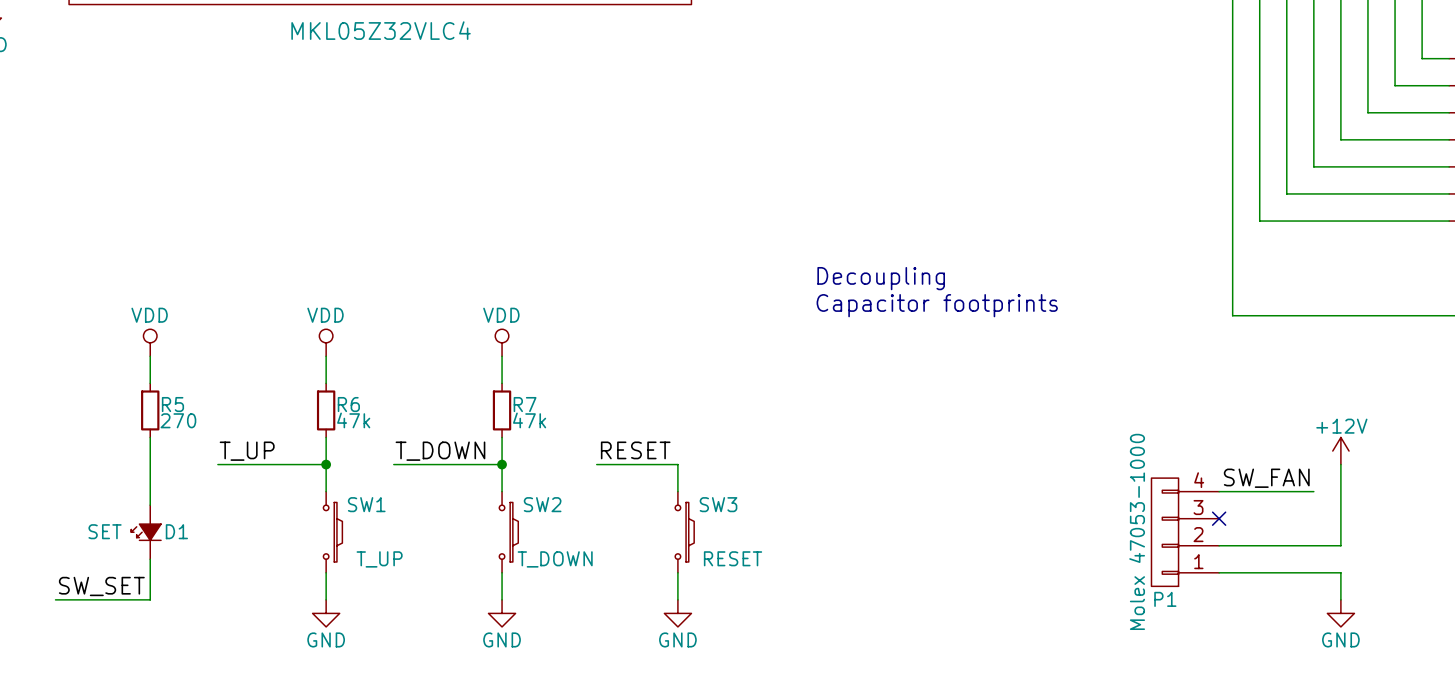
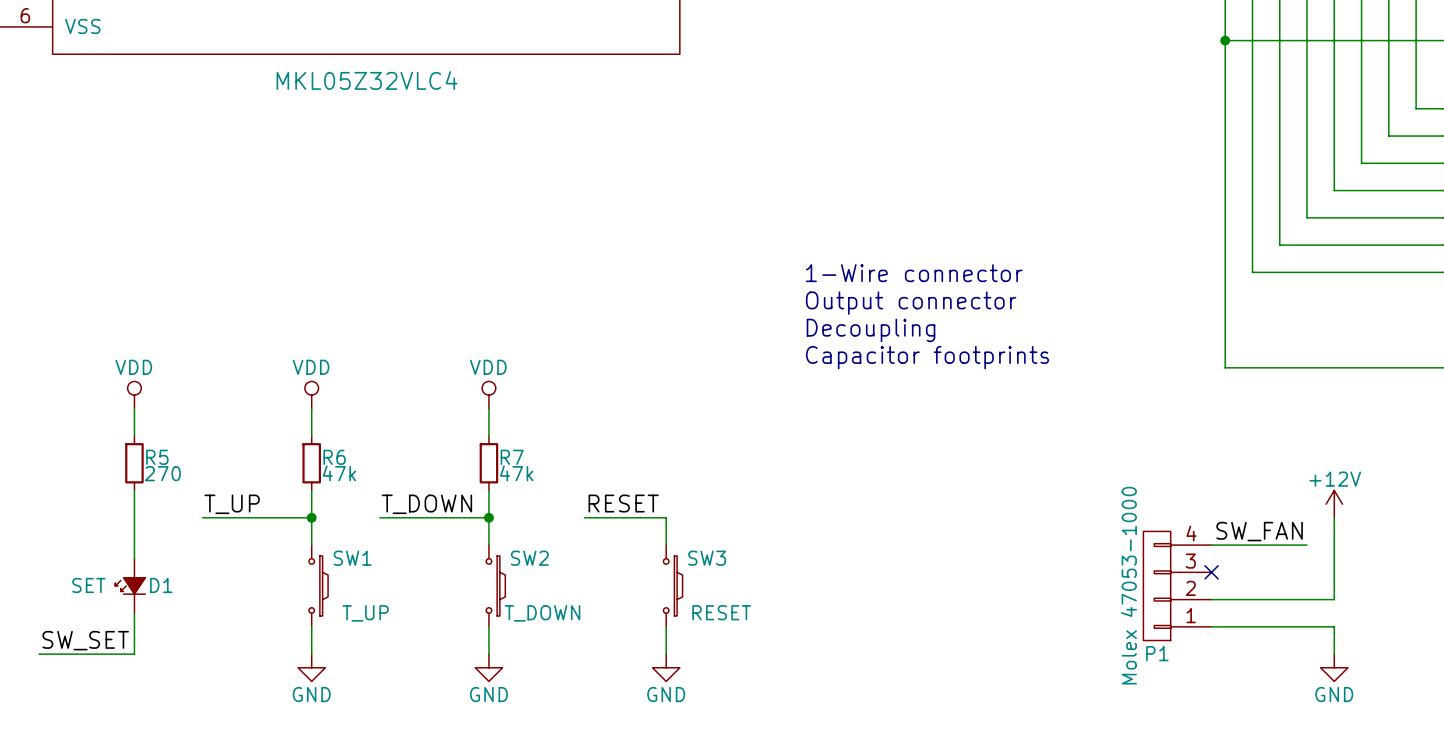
text: none -> 1-Wire connector (914, 273)
text: none -> Output connector (911, 303)

